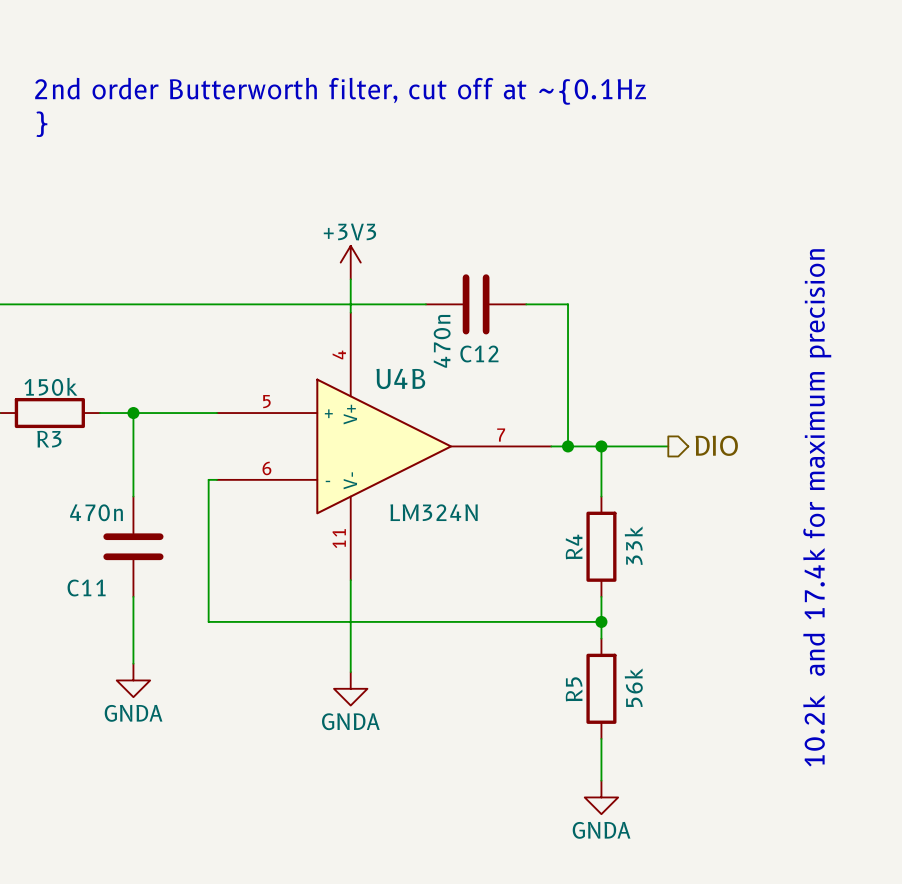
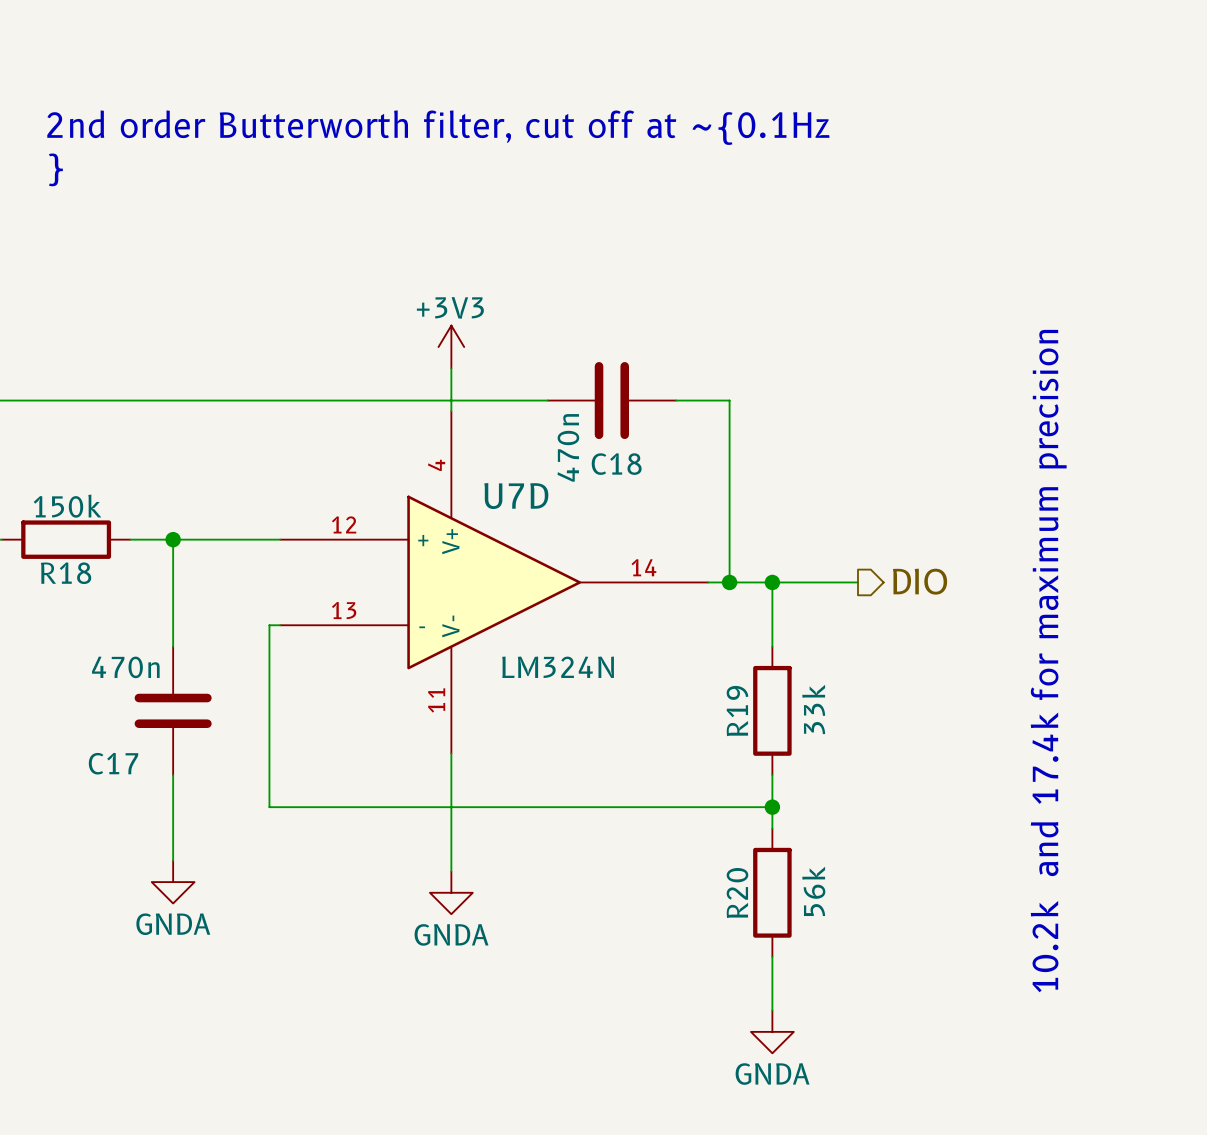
C12 name: C12 (479, 353) -> C18 (616, 464)
U4B name: U4B (400, 378) -> U7D (516, 496)
U4B pin number: 5 (266, 401) -> 12 (344, 524)
U4B pin number: 7 (501, 435) -> 14 (643, 567)
R3 name: R3 (49, 439) -> R18 (66, 573)
U4B pin number: 6 (266, 468) -> 13 (344, 610)
R4 name: R4 (574, 546) -> R19 (737, 711)
C11 name: C11 (86, 587) -> C17 (113, 763)
R5 name: R5 (574, 689) -> R20 (737, 893)

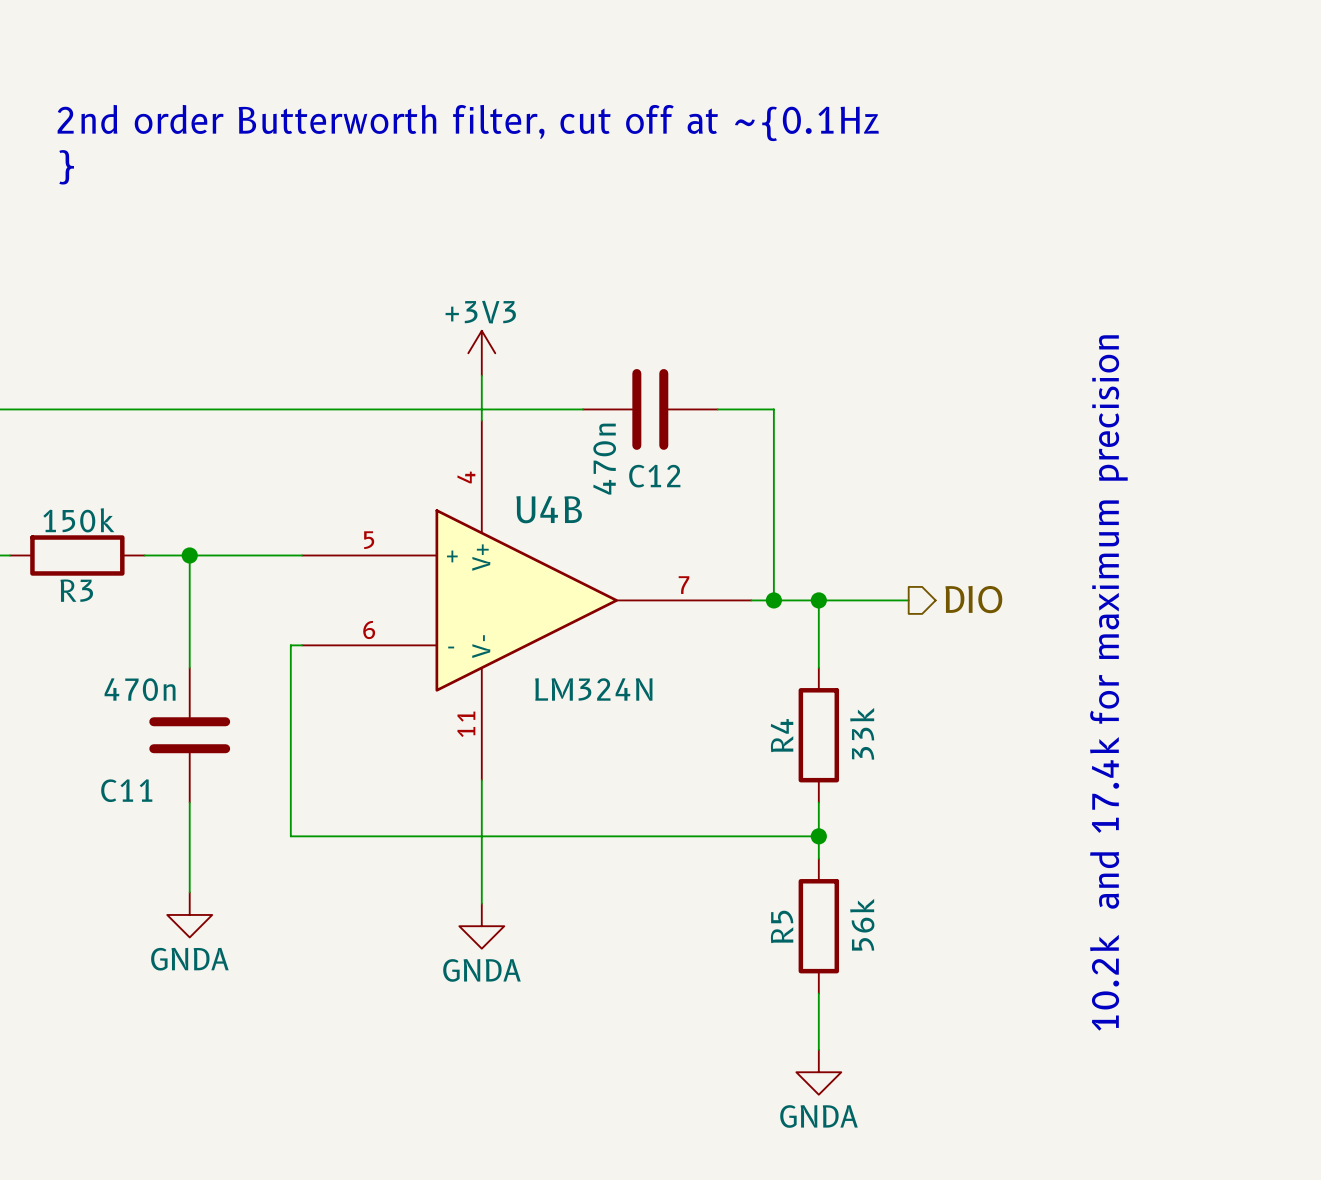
C18 name: C18 (616, 464) -> C12 (654, 476)
U7D name: U7D (516, 496) -> U4B (549, 509)
U7D pin number: 12 (344, 524) -> 5 (369, 540)
U7D pin number: 14 (643, 567) -> 7 (684, 585)
R18 name: R18 (66, 573) -> R3 (76, 590)
U7D pin number: 13 (344, 610) -> 6 (369, 630)
R19 name: R19 (737, 711) -> R4 (782, 735)
C17 name: C17 (113, 763) -> C11 (126, 790)
R20 name: R20 (737, 893) -> R5 (782, 926)

